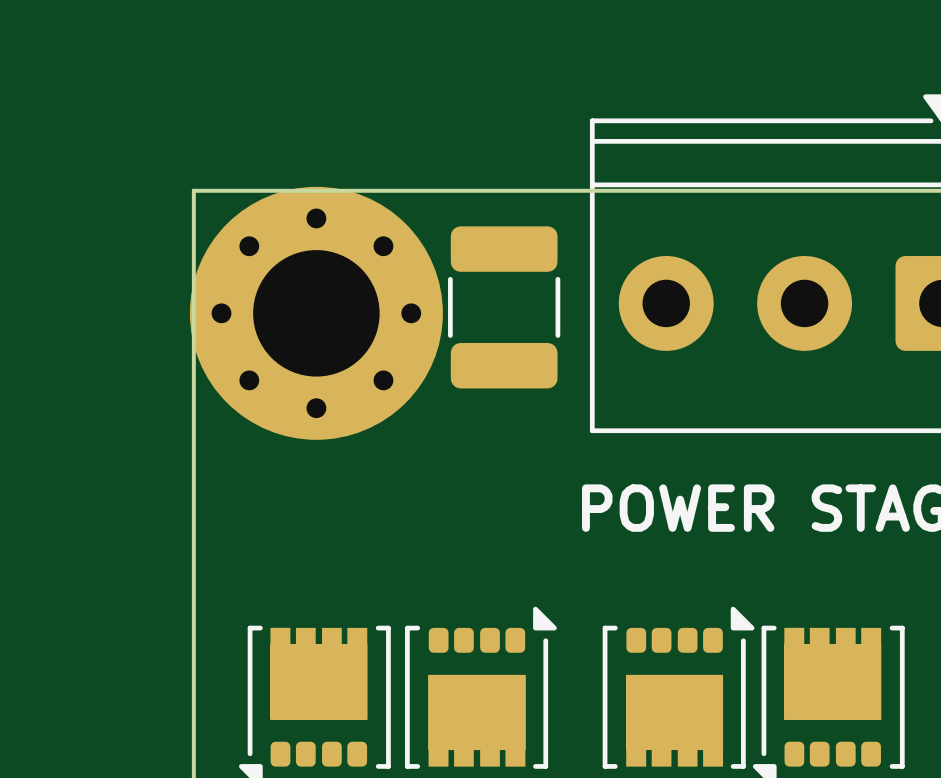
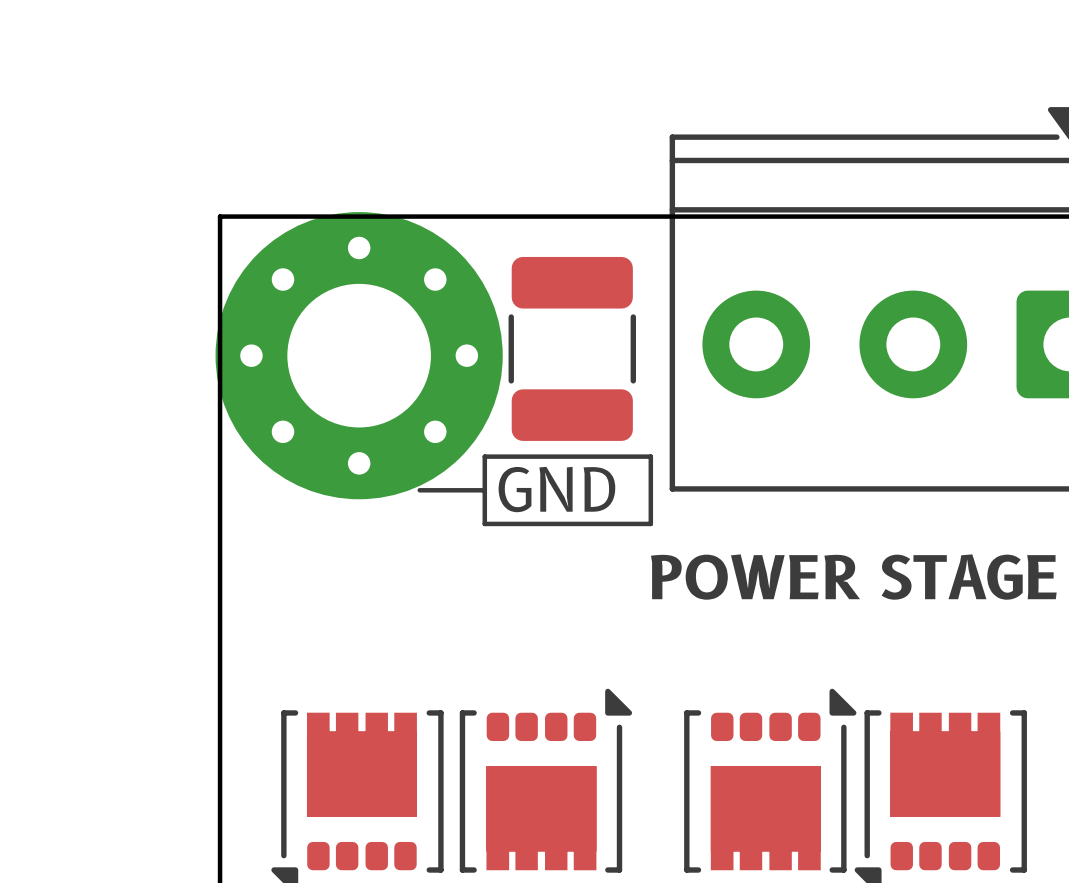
line: none -> (484, 456) (650, 456) (650, 523) (484, 523) (484, 456)
line: none -> (419, 490) (484, 490)
text: none -> GND (556, 489)

